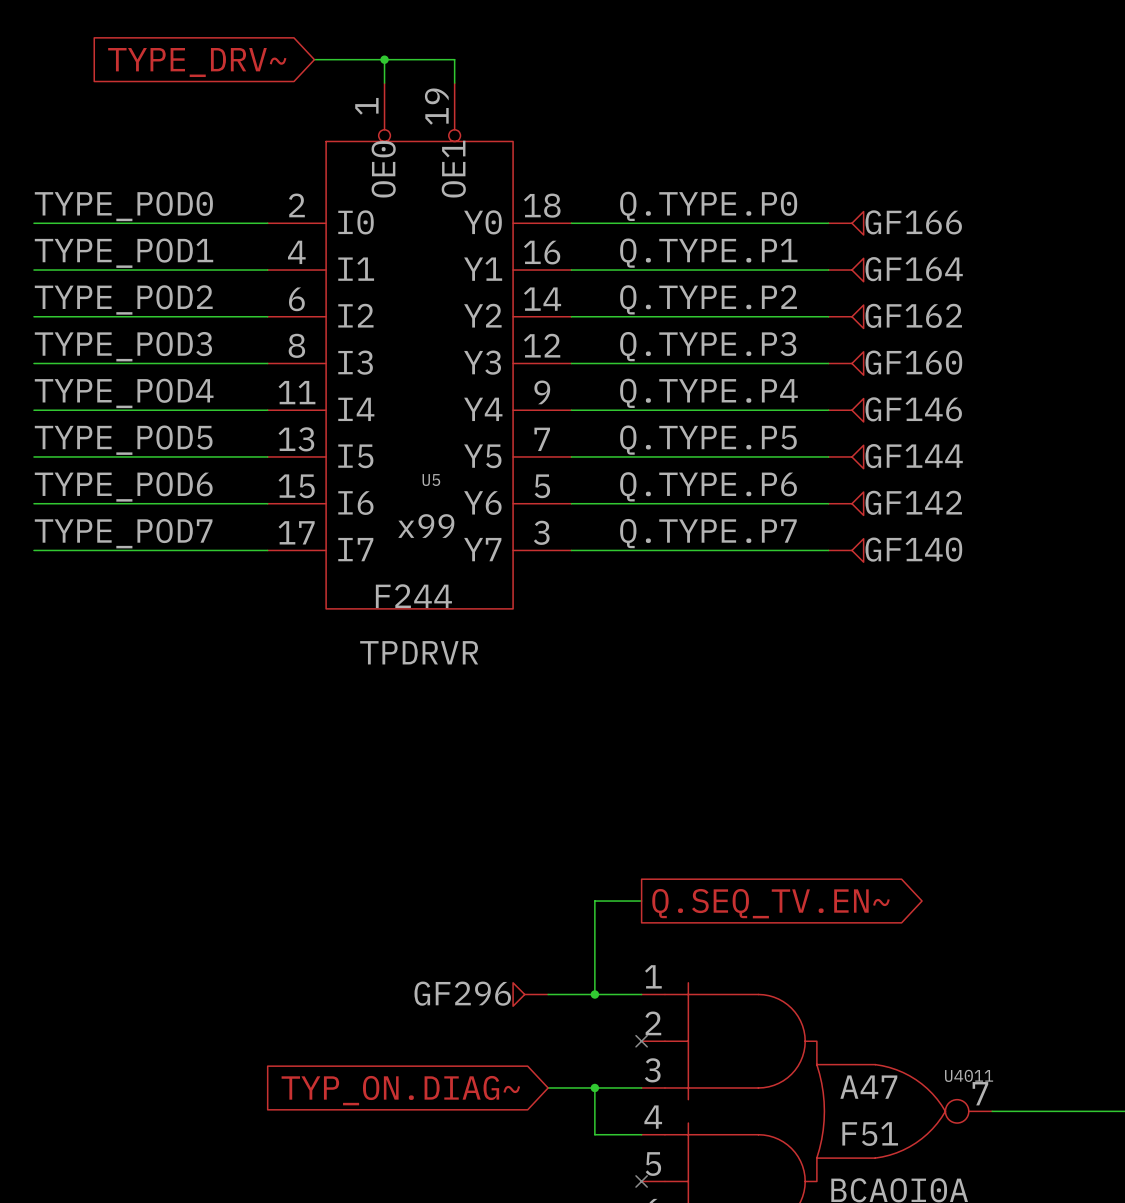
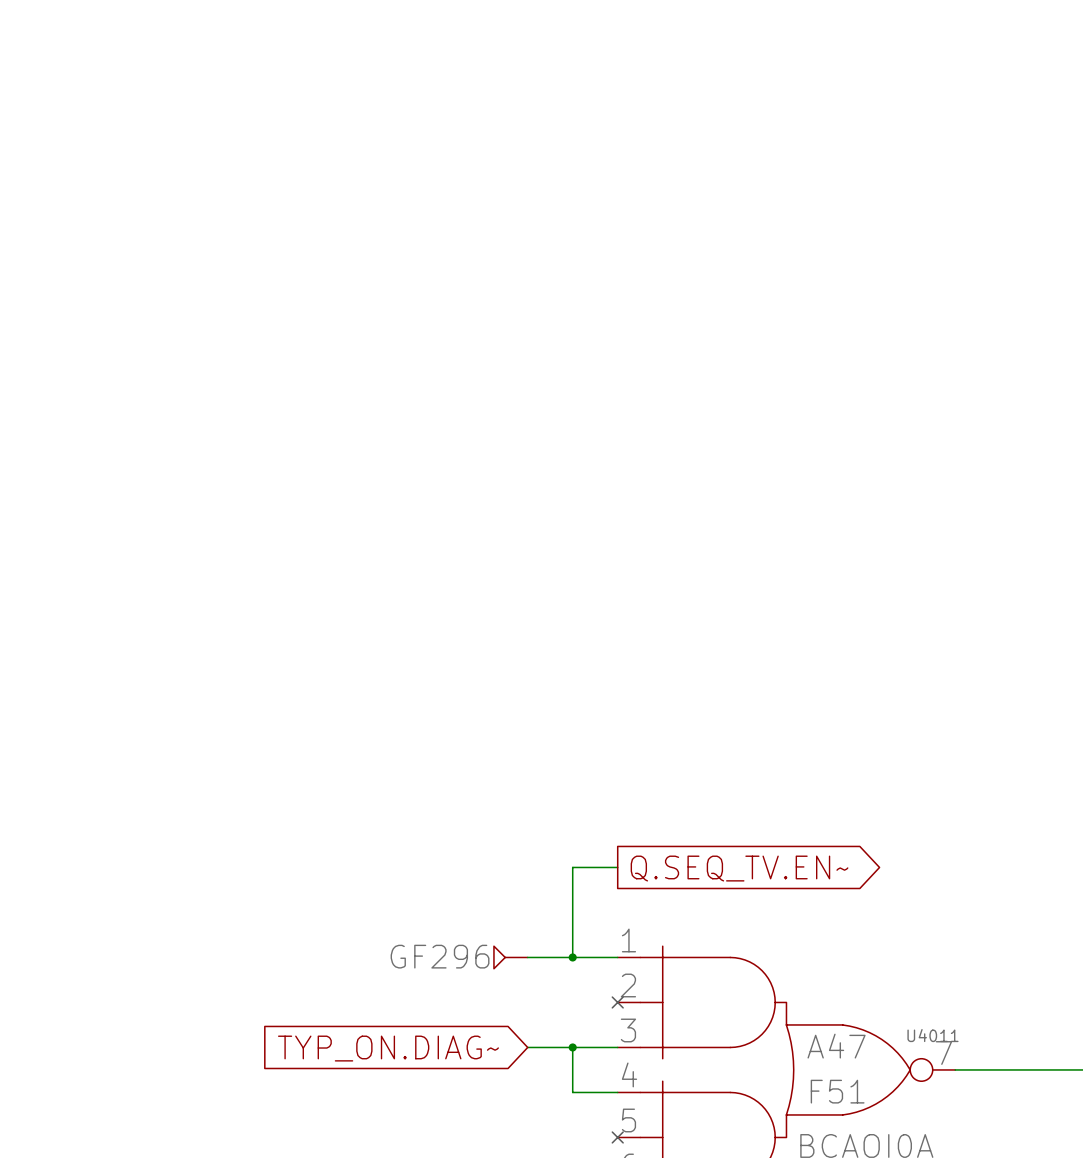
wire: (314, 59) (454, 59) (454, 83) -> none
wire: (384, 59) (384, 83) -> none
junction: (384, 59) -> none
global label: TYPE_DRV~ (197, 62) -> none
label: TYPE_POD0 (123, 206) -> none
label: Q.TYPE.P0 (708, 206) -> none
wire: (33, 223) (267, 223) -> none
wire: (571, 223) (828, 223) -> none
GF166: (846, 223) -> none
label: TYPE_POD1 (124, 253) -> none
label: Q.TYPE.P1 (708, 253) -> none
wire: (33, 270) (267, 270) -> none
wire: (571, 270) (828, 270) -> none
GF164: (846, 270) -> none
label: TYPE_POD2 (123, 299) -> none
label: Q.TYPE.P2 (708, 299) -> none
wire: (33, 316) (267, 316) -> none
wire: (571, 316) (828, 316) -> none
GF162: (846, 316) -> none
U5: F244 (419, 345) -> none
label: TYPE_POD3 (123, 346) -> none
label: Q.TYPE.P3 (708, 346) -> none
wire: (33, 363) (267, 363) -> none
wire: (571, 363) (828, 363) -> none
GF160: (846, 363) -> none
label: TYPE_POD4 (124, 393) -> none
label: Q.TYPE.P4 (708, 393) -> none
wire: (33, 410) (267, 410) -> none
wire: (571, 410) (828, 410) -> none
GF146: (846, 410) -> none
label: TYPE_POD5 (123, 440) -> none
label: Q.TYPE.P5 (708, 440) -> none
wire: (33, 456) (267, 456) -> none
wire: (571, 456) (828, 456) -> none
GF144: (846, 456) -> none
label: TYPE_POD6 (123, 486) -> none
label: Q.TYPE.P6 (708, 486) -> none
wire: (33, 503) (267, 503) -> none
wire: (571, 503) (828, 503) -> none
GF142: (846, 503) -> none
label: TYPE_POD7 (123, 533) -> none
label: Q.TYPE.P7 (708, 533) -> none
wire: (33, 550) (267, 550) -> none
wire: (571, 550) (828, 550) -> none
GF140: (846, 550) -> none

